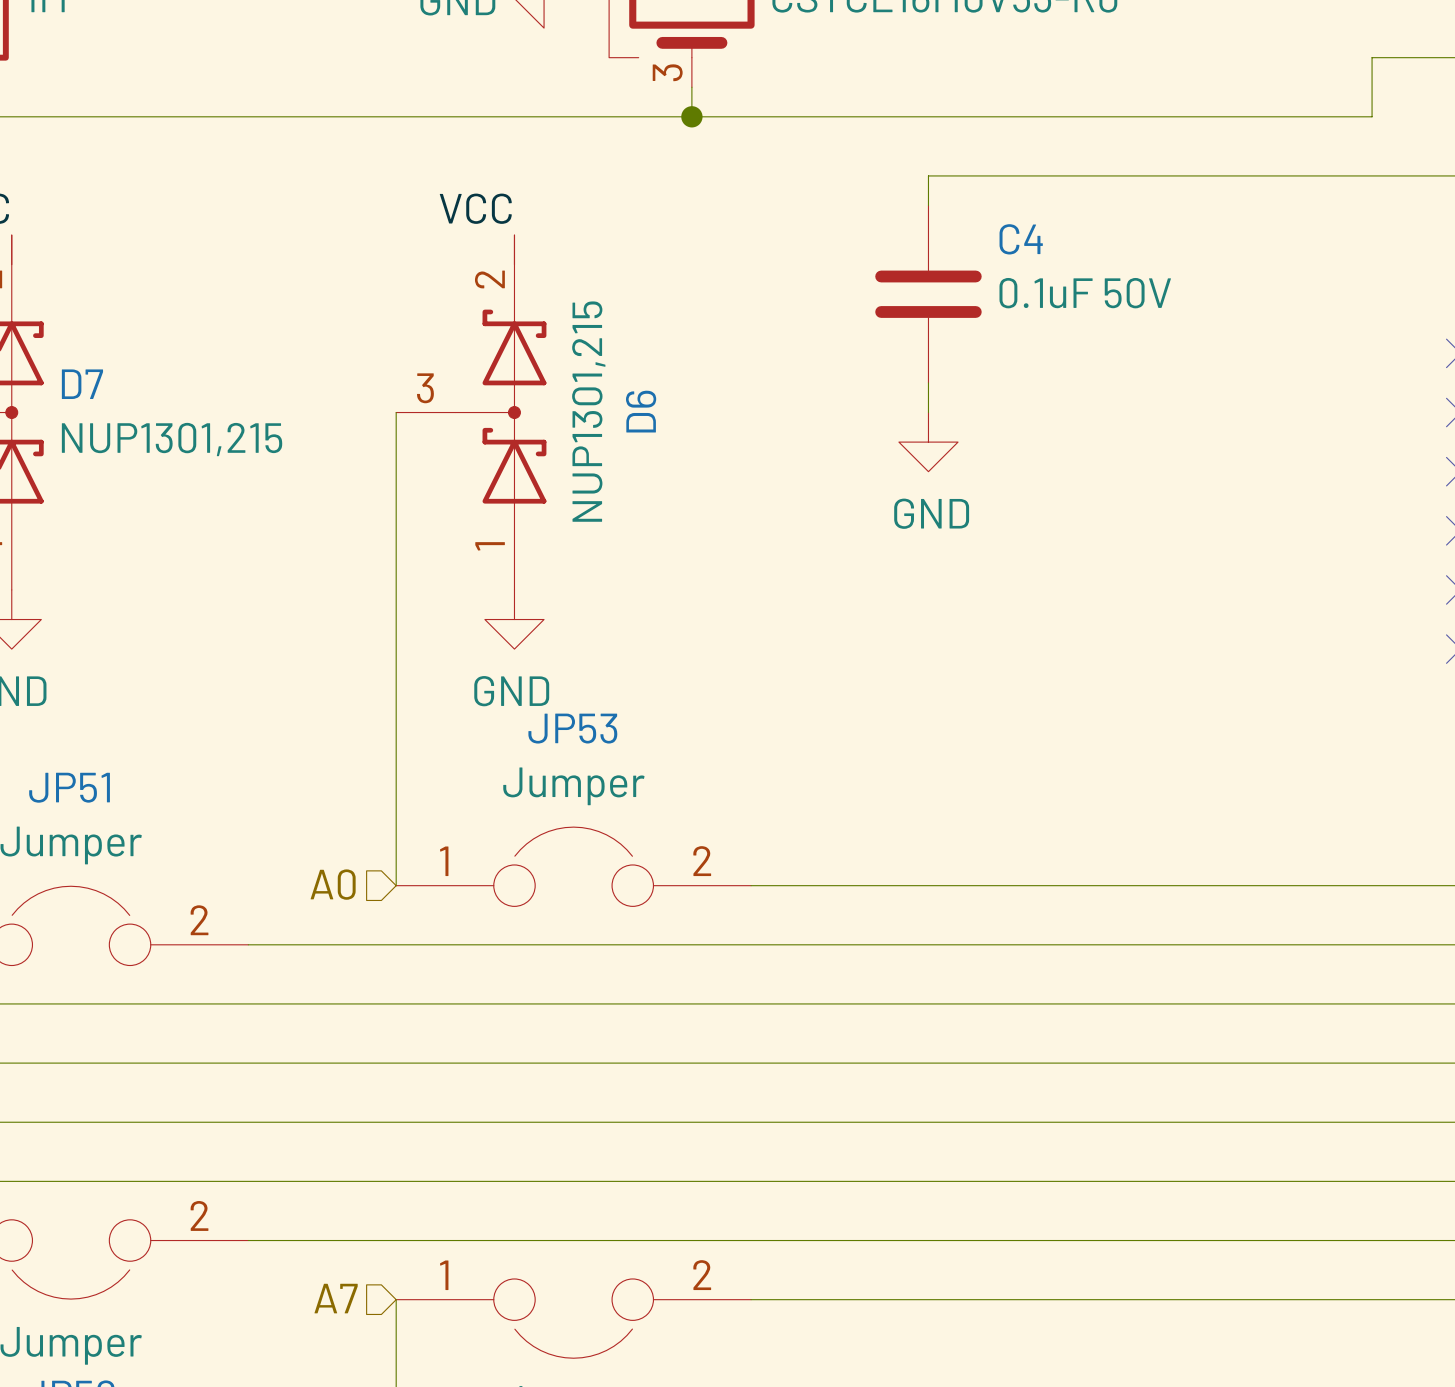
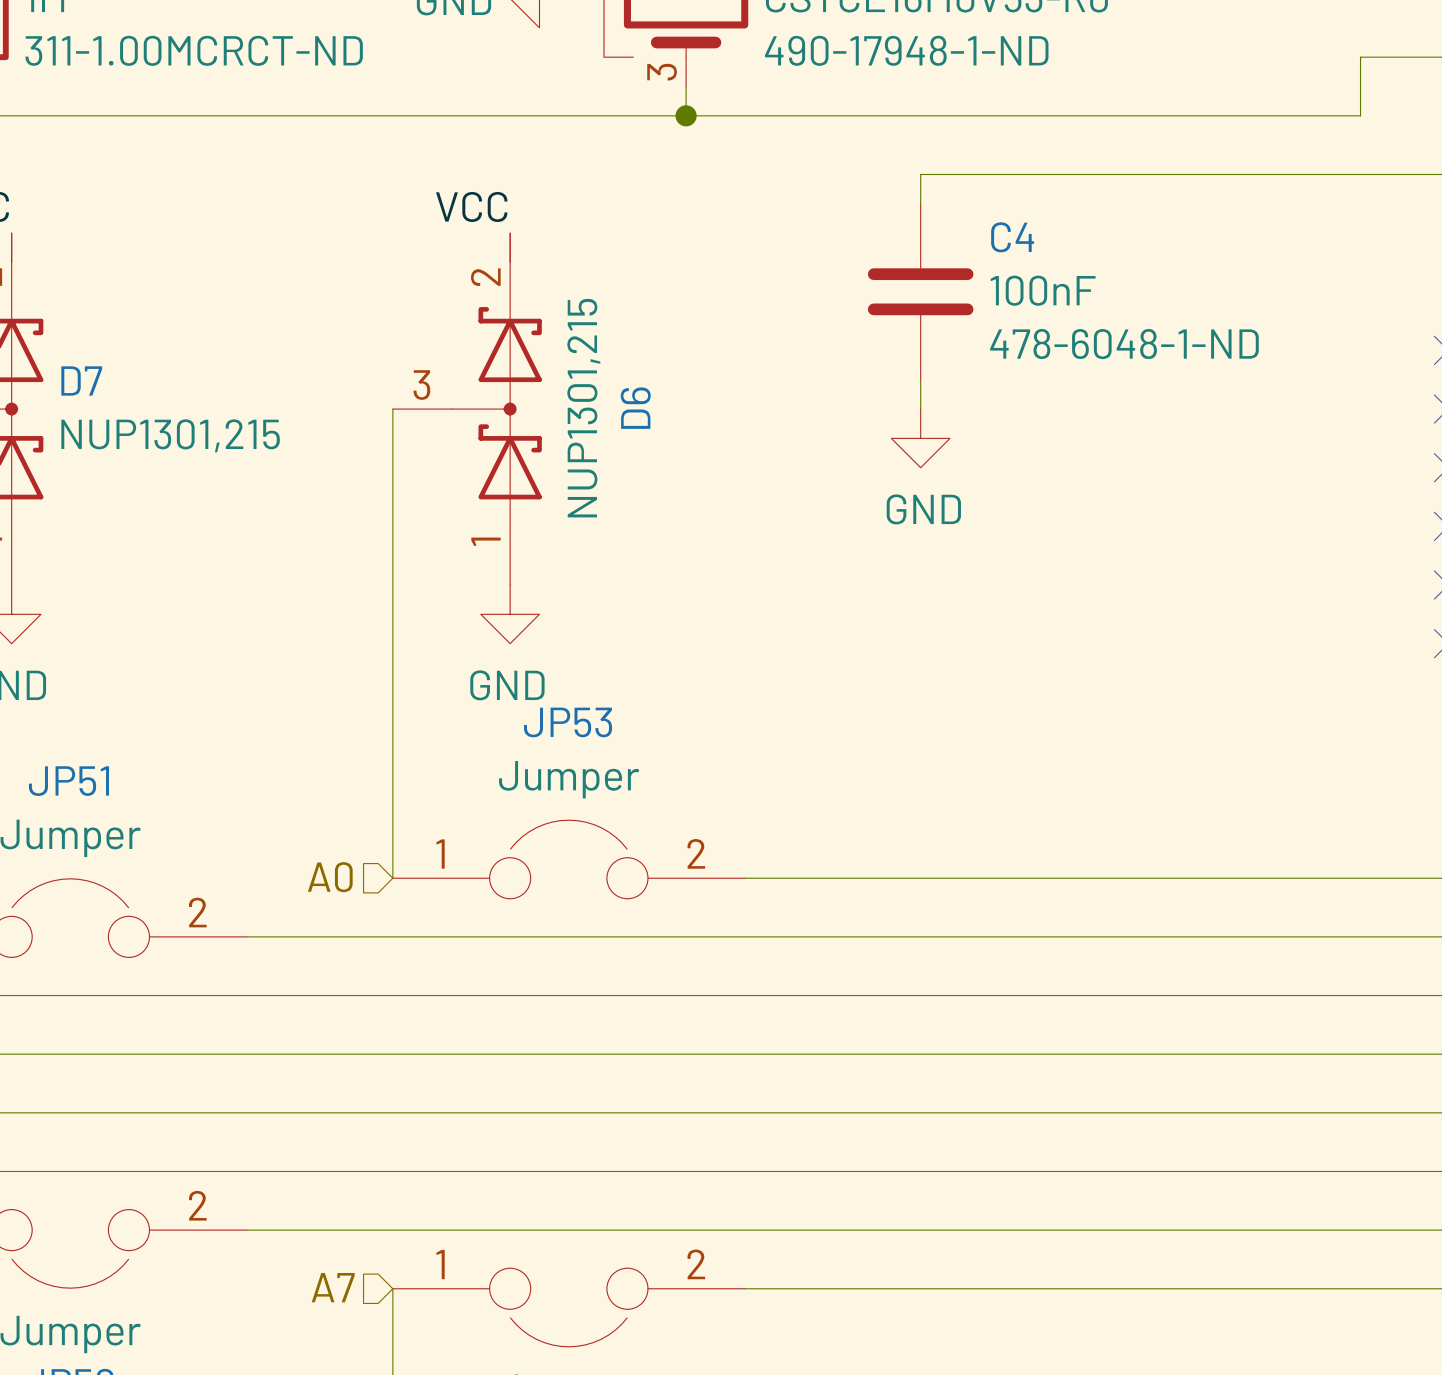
part text: none -> 311-1.00MCRCT-ND (194, 50)
part text: none -> 490-17948-1-ND (906, 50)
C4 value: 0.1uF 50V (1085, 293) -> 100nF (1043, 290)
C4 text: none -> 478-6048-1-ND (1124, 344)

